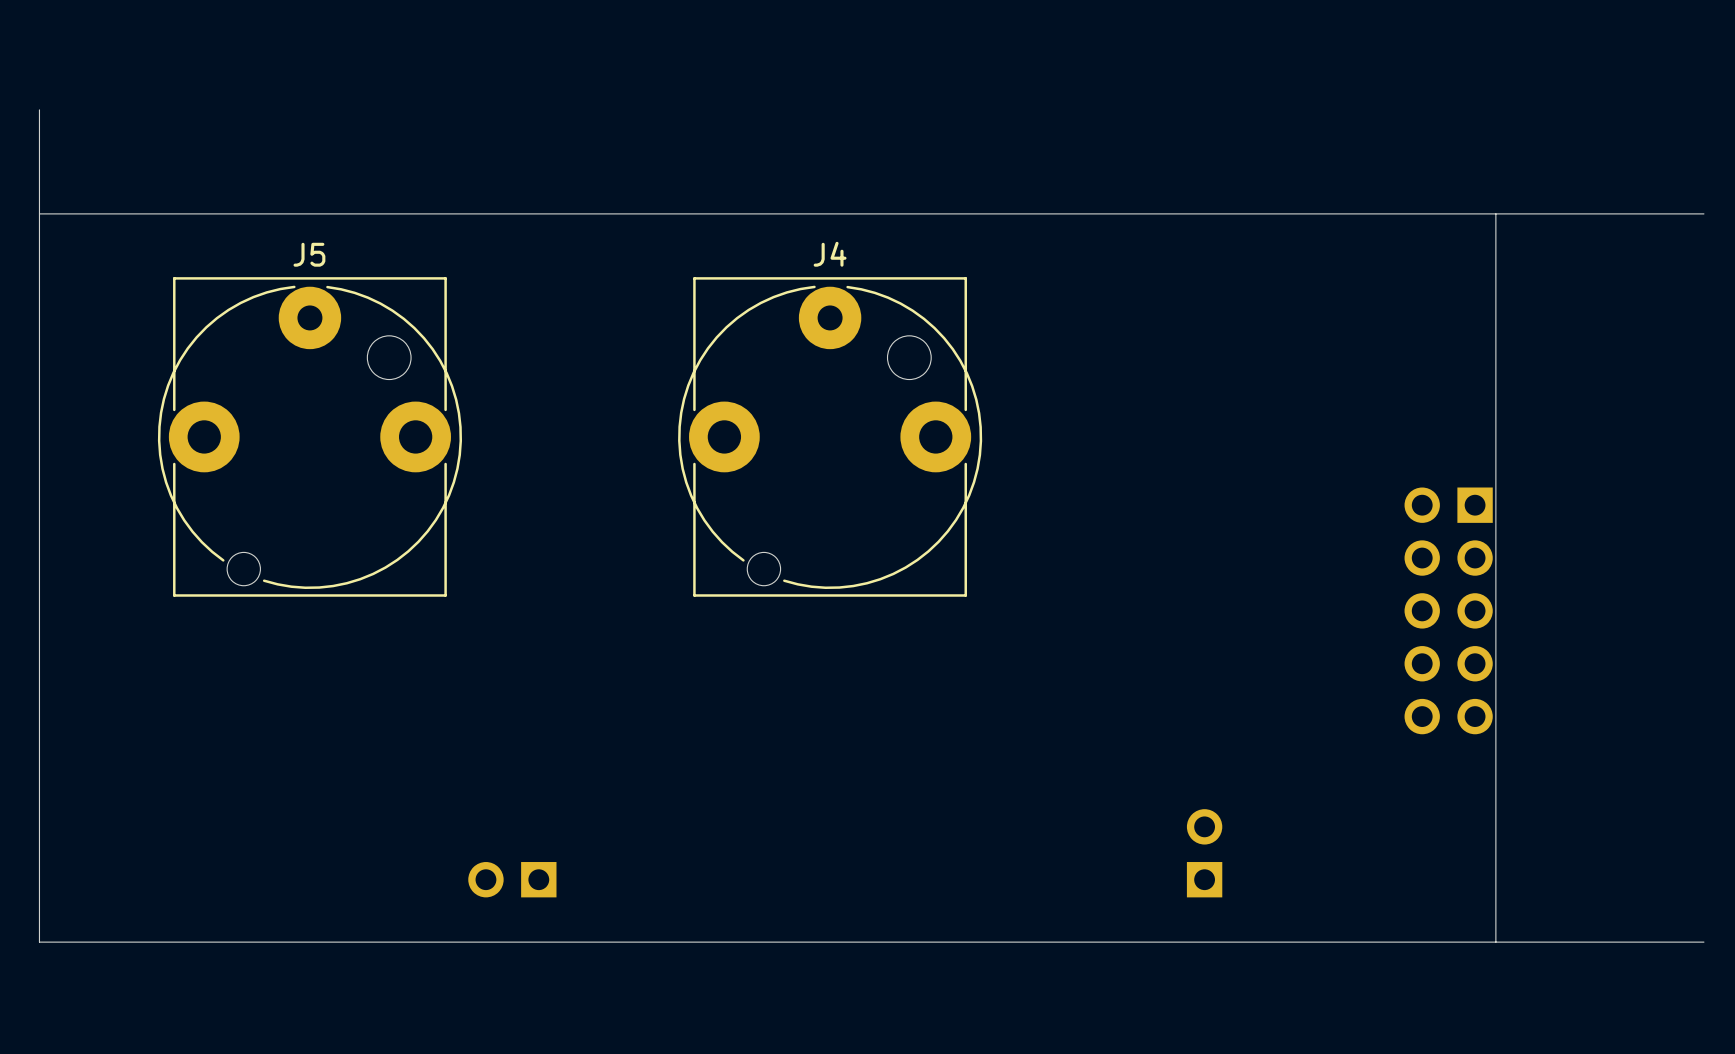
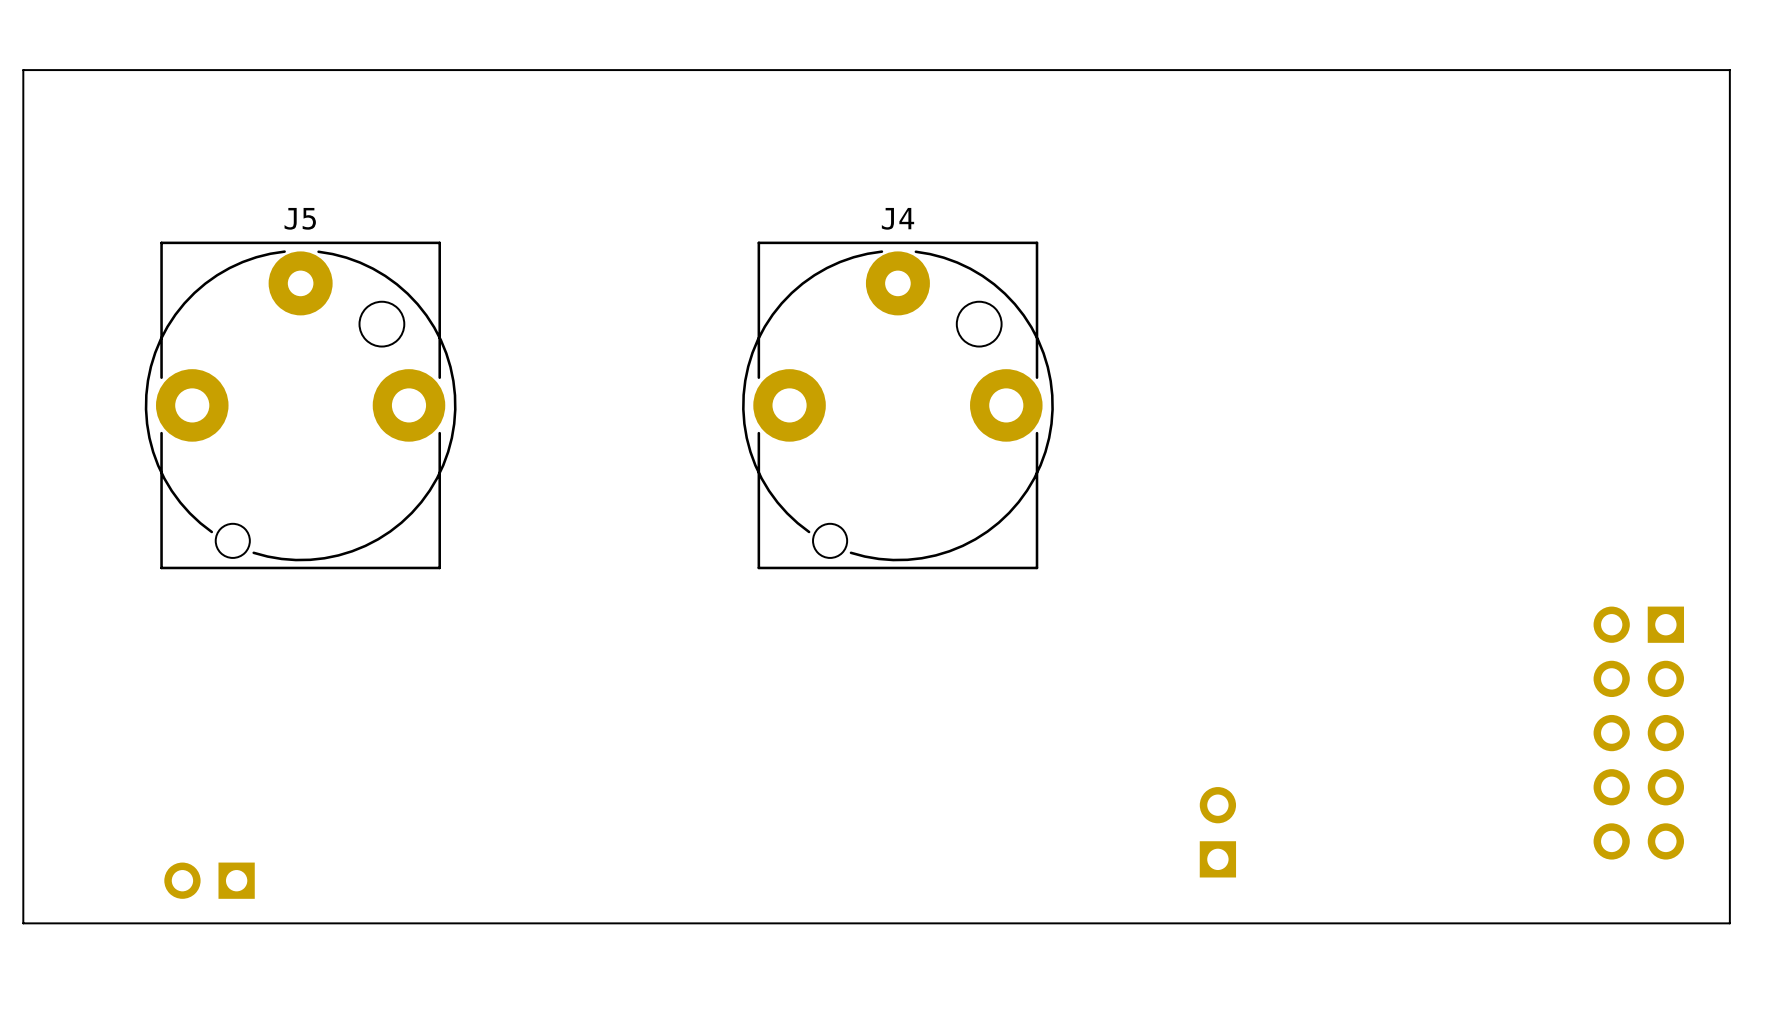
board edge: none -> (23, 70) (1729, 70) (1729, 923)
board edge: (1495, 213) (1495, 942) -> none
board edge: (1703, 213) (39, 213) -> none
J4 position: (830, 436) -> (897, 405)
part position: (1448, 610) -> (1638, 733)
part position: (512, 879) -> (209, 880)

